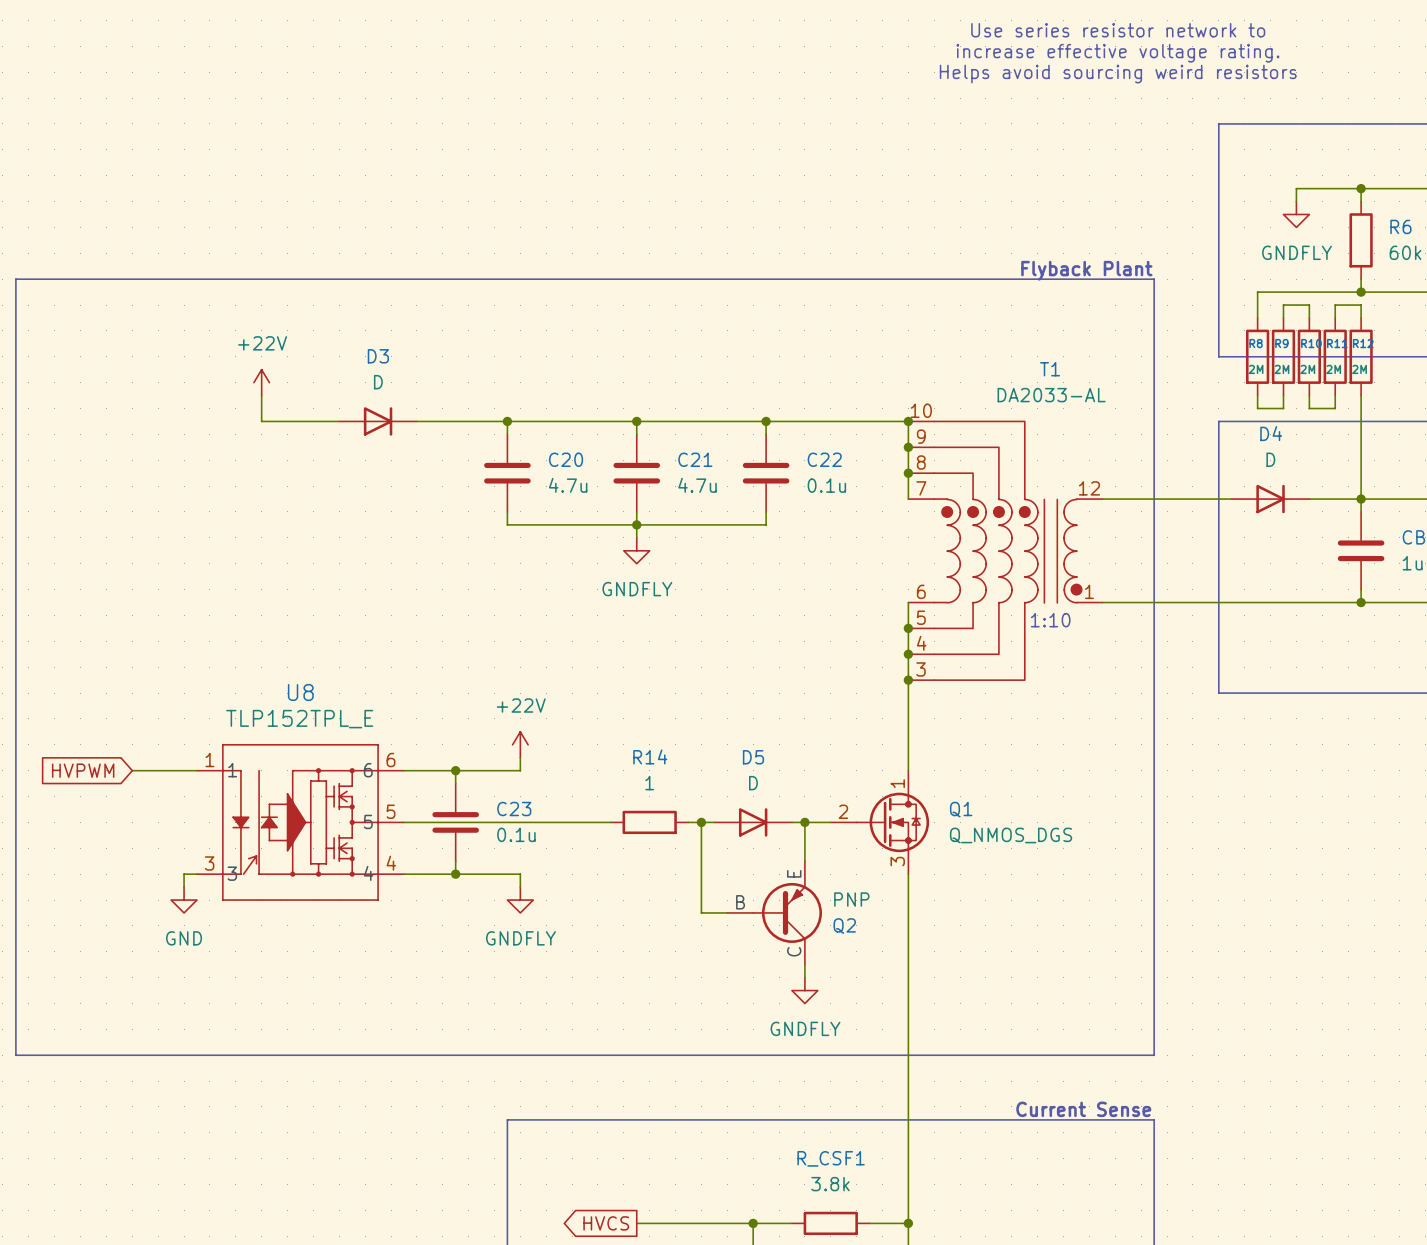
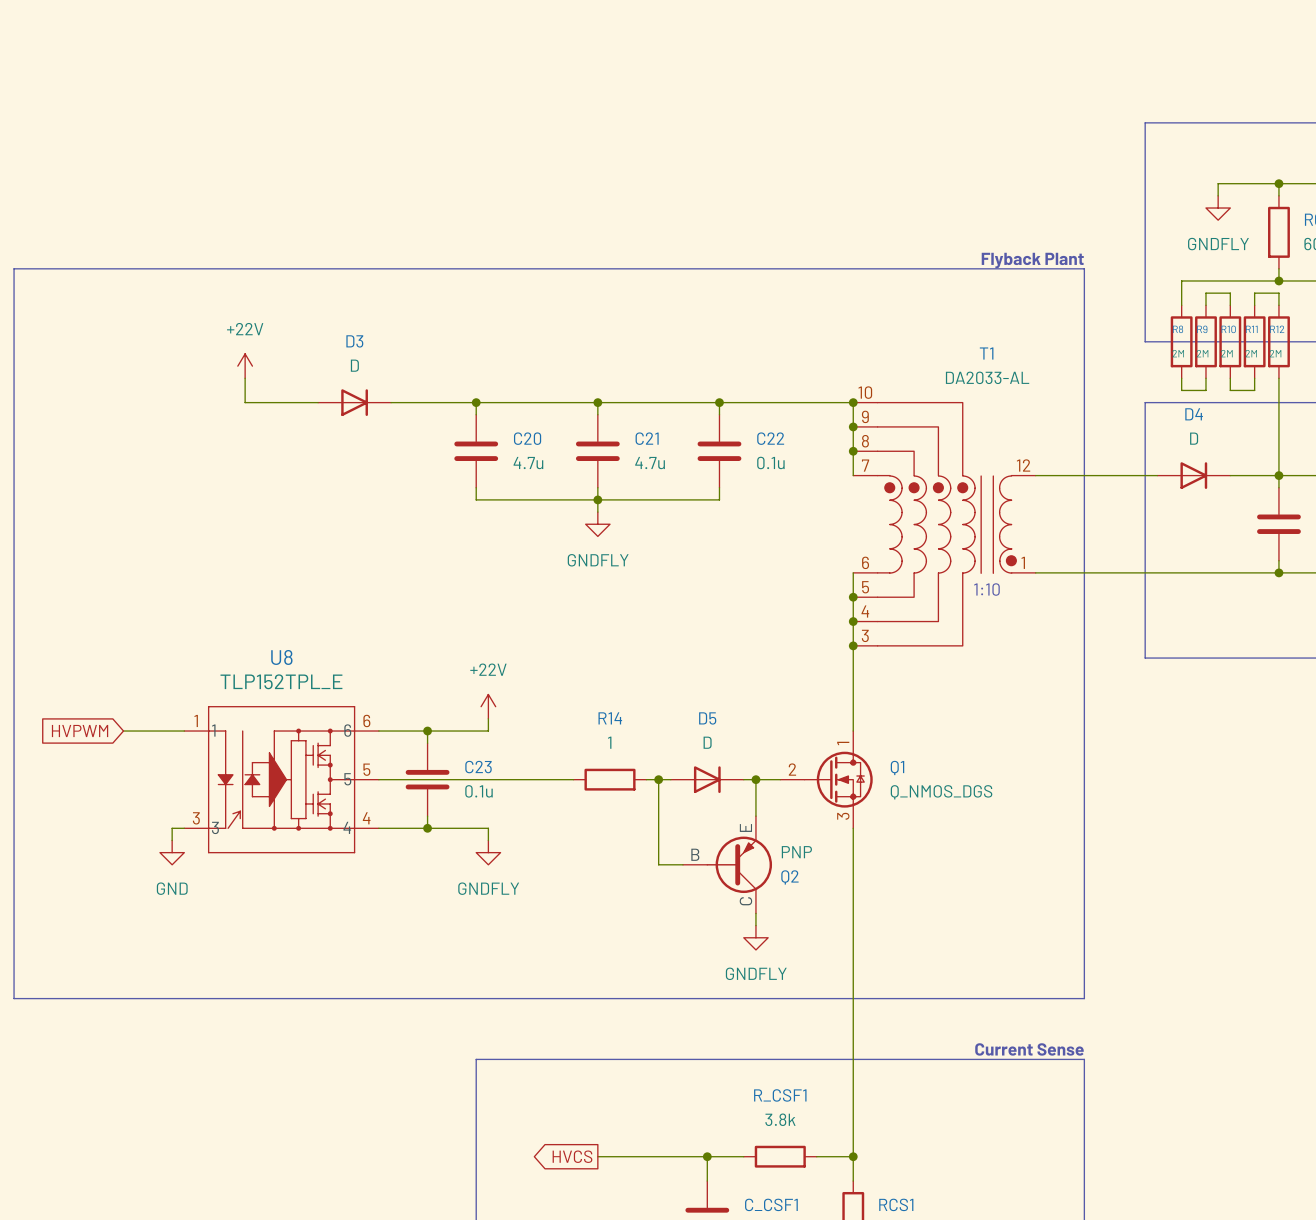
text: Use series resistor network to (1118, 30) -> none
text: increase effective voltage rating. (1117, 53) -> none
text: Helps avoid sourcing weird resistors (1118, 74) -> none

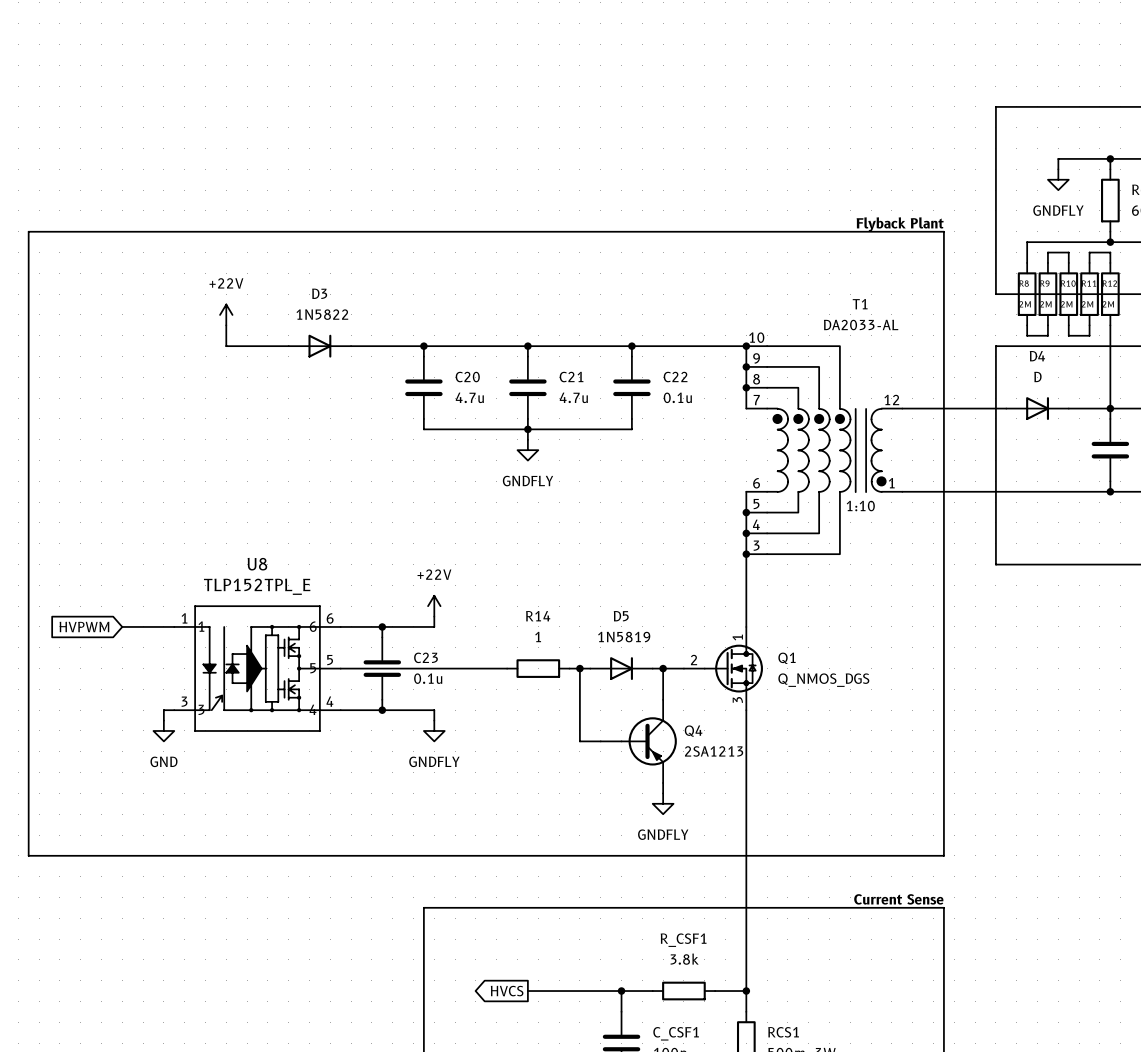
D3 value: D (354, 365) -> 1N5822 (322, 314)
D5 value: D (707, 742) -> 1N5819 (624, 637)
Q2: PNP (727, 864) -> none
Q4: none -> 2SA1213 (638, 741)

